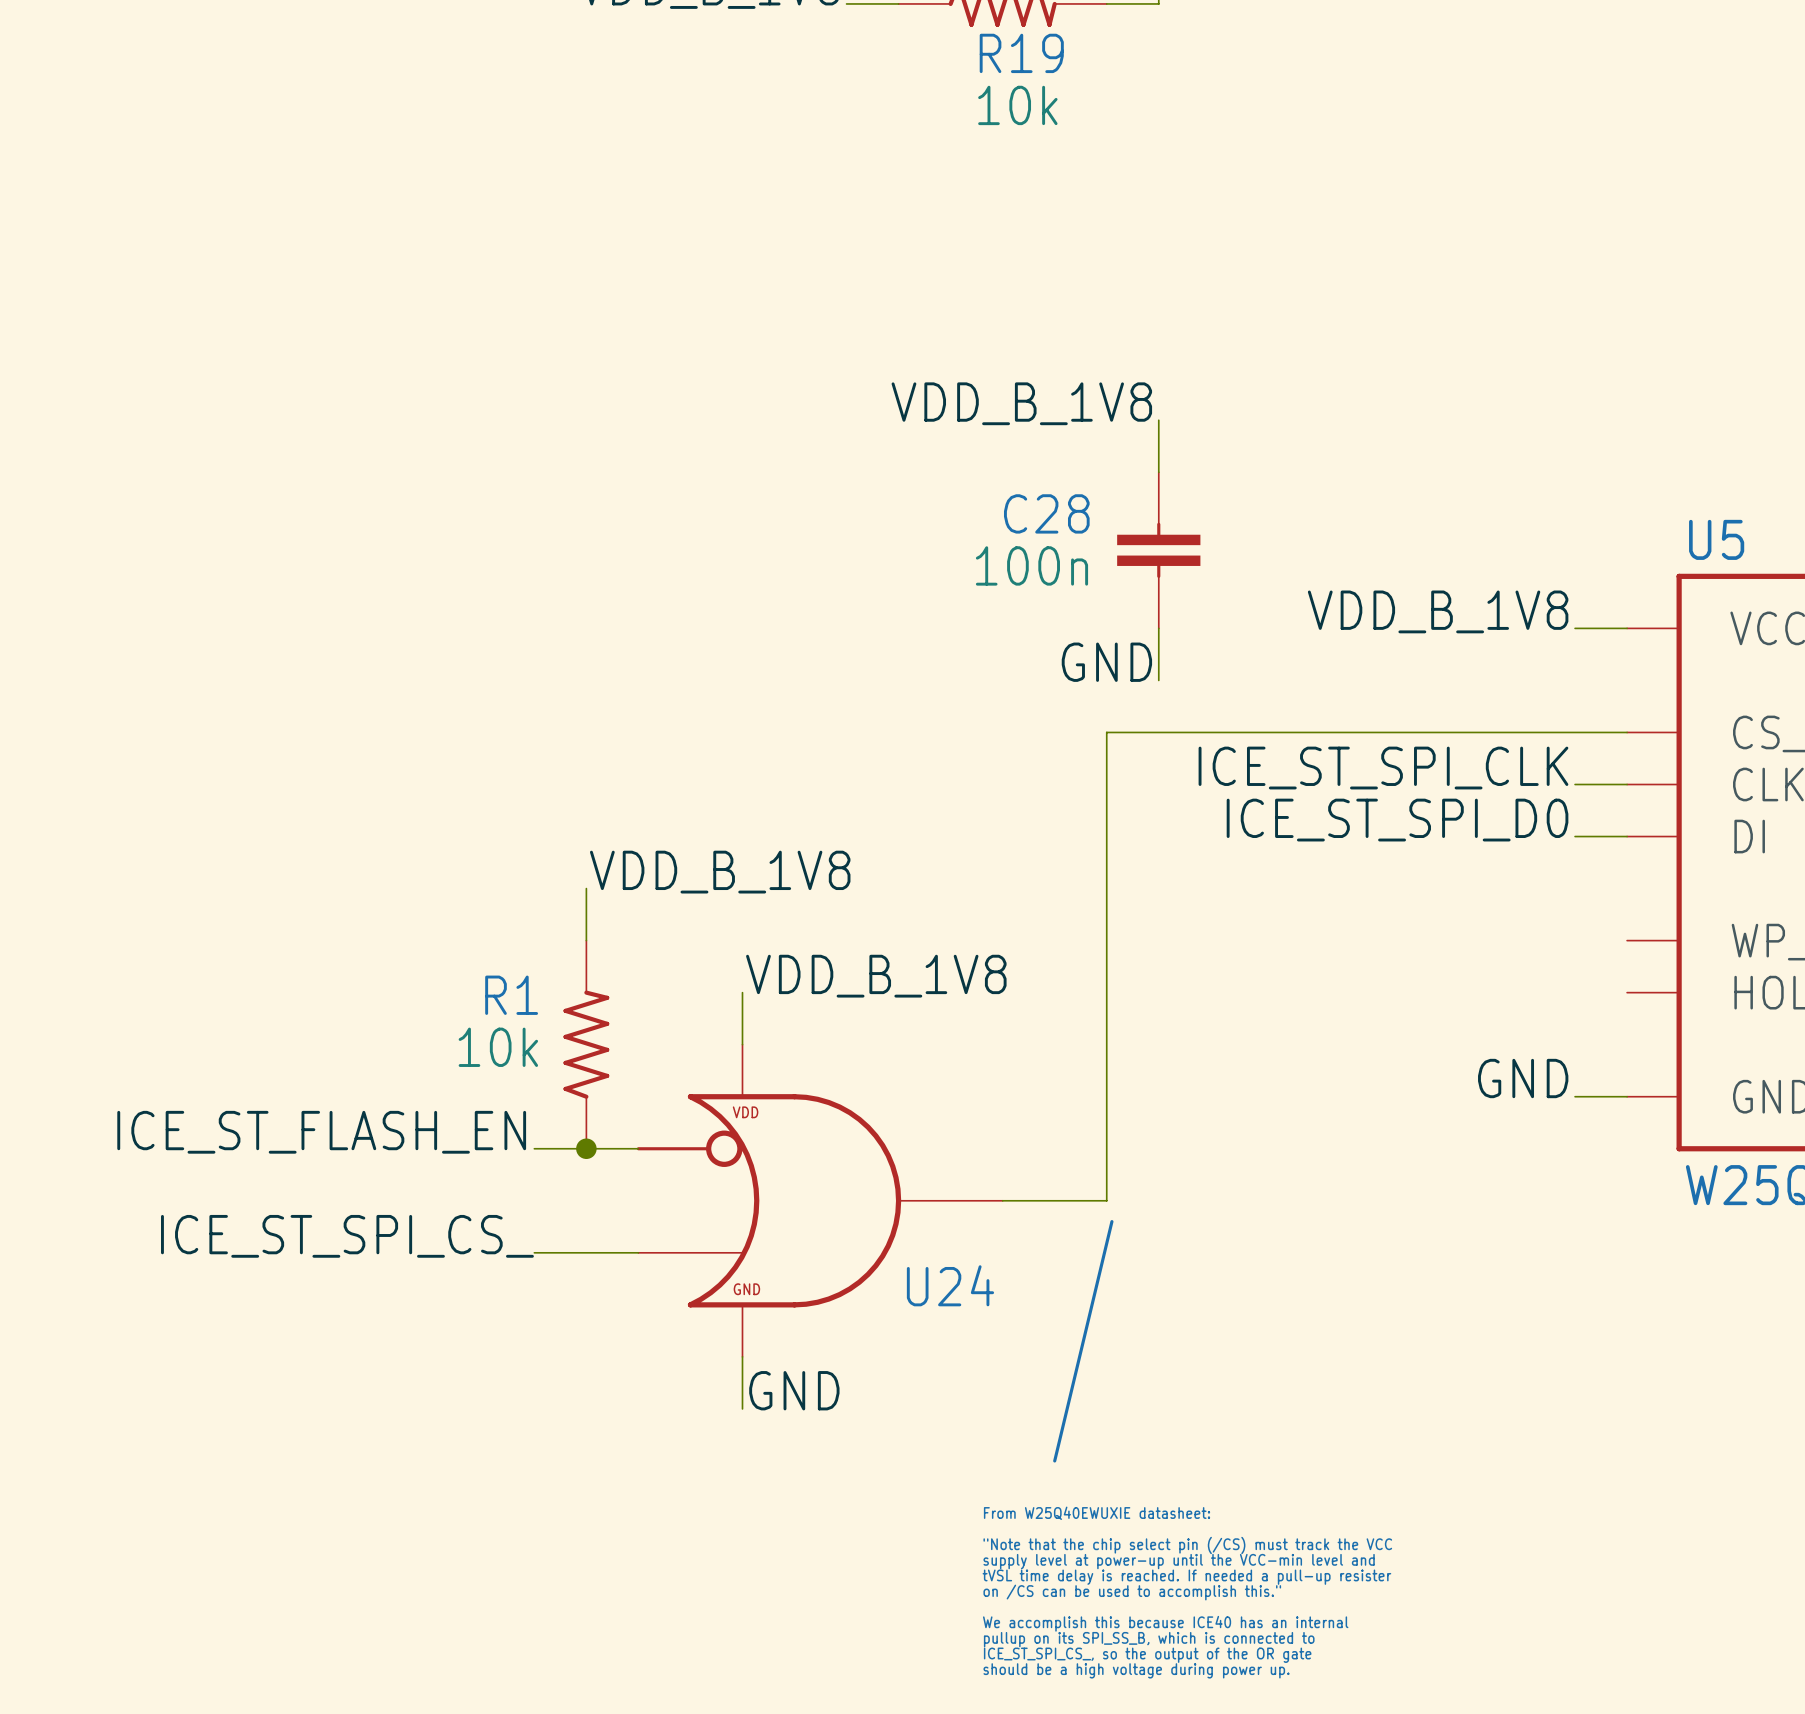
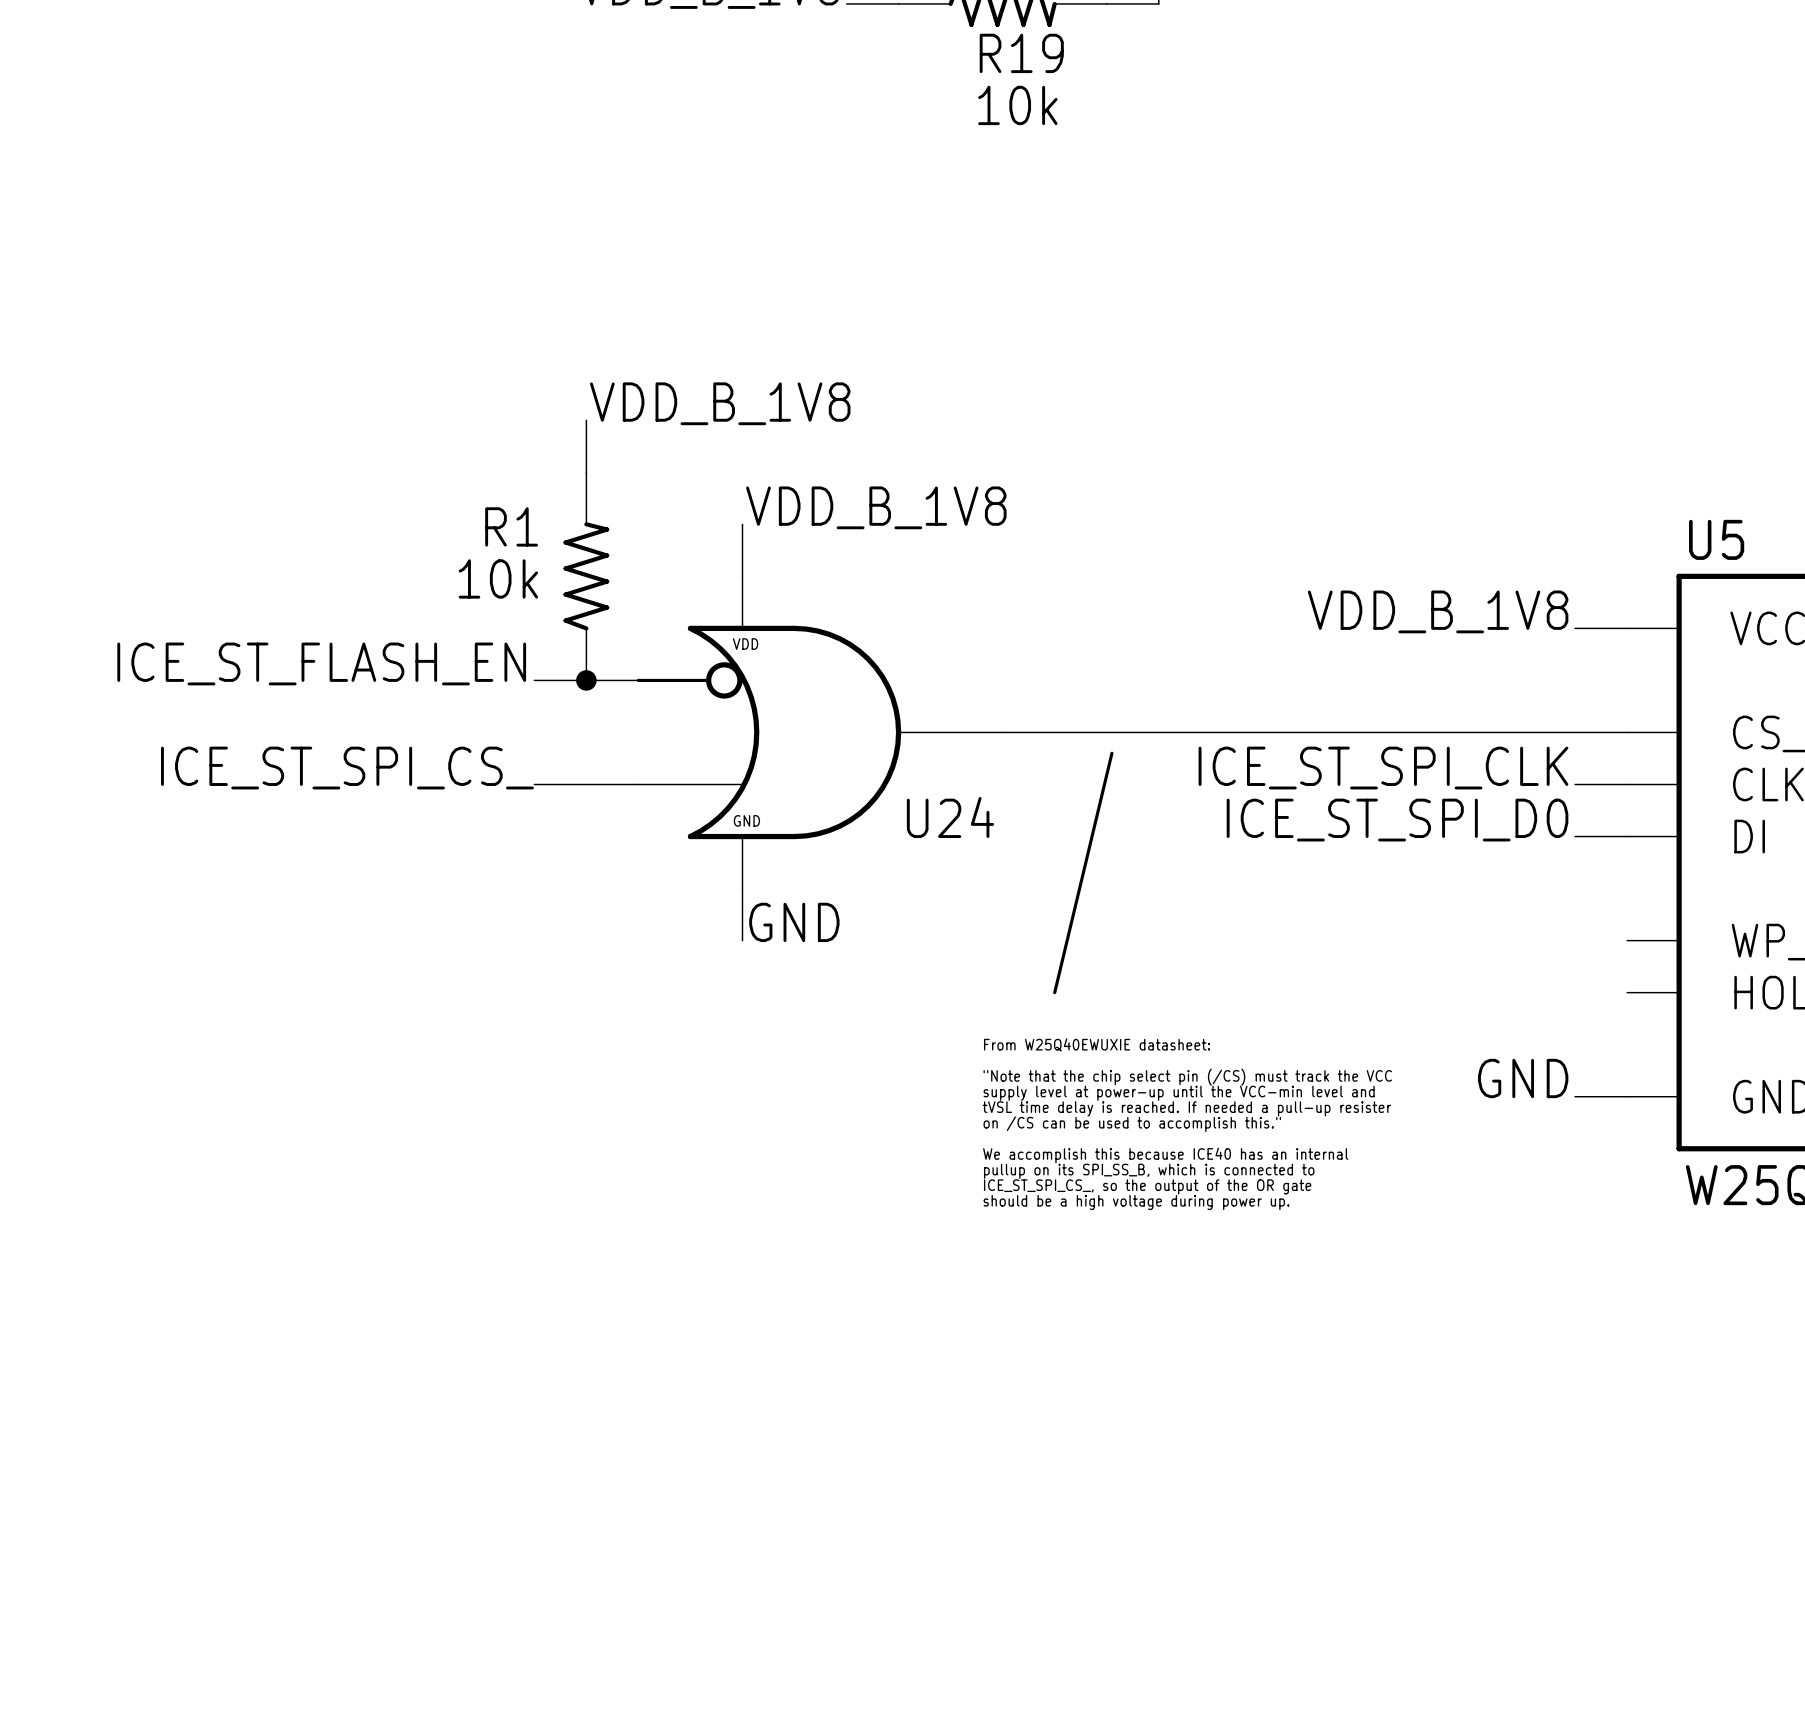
label: none -> VDD_B_1V8 (720, 403)
label: VDD_B_1V8 (1021, 403) -> none
wire: (1158, 420) (1158, 472) -> none
label: none -> VDD_B_1V8 (876, 507)
C28: 100n (1158, 550) -> none
wire: (1158, 628) (1158, 680) -> none
label: GND (1106, 662) -> none
junction: none -> (586, 680)
wire: (1106, 732) (1106, 1200) (1002, 1200) -> (1106, 732) (1002, 732)
label: VDD_B_1V8 (720, 872) -> none
wire: (586, 888) (586, 940) -> (586, 420) (586, 472)
label: none -> GND (794, 922)
label: VDD_B_1V8 (876, 976) -> none
wire: (742, 992) (742, 1044) -> (742, 524) (742, 576)
R1 position: (586, 1044) -> (586, 576)
label position: ICE_ST_FLASH_EN (321, 1132) -> ICE_ST_FLASH_EN (321, 663)
wire: (534, 1148) (638, 1148) -> (534, 680) (638, 680)
junction: (586, 1148) -> none
U24 position: (819, 1200) -> (819, 732)
line: (1111, 1221) (1054, 1460) -> (1111, 753) (1054, 992)
label position: ICE_ST_SPI_CS_ (347, 1236) -> ICE_ST_SPI_CS_ (347, 768)
wire: (534, 1252) (638, 1252) -> (534, 784) (638, 784)
wire: (742, 1356) (742, 1408) -> (742, 888) (742, 940)
label: GND (794, 1390) -> none
text position: From W25Q40EWUXIE datasheet: (1097, 1513) -> From W25Q40EWUXIE datasheet: (1097, 1044)
text position: "Note that the chip select pin (/CS) must track the VCC (1187, 1545) -> "Note that the chip select pin (/CS) must track the VCC (1187, 1077)
text position: supply level at power-up until the VCC-min level and (1179, 1561) -> supply level at power-up until the VCC-min level and (1179, 1093)
text position: tVSL time delay is reached. If needed a pull-up resister (1186, 1577) -> tVSL time delay is reached. If needed a pull-up resister (1186, 1108)
text position: on /CS can be used to accomplish this." (1132, 1592) -> on /CS can be used to accomplish this." (1132, 1124)
text position: We accomplish this because ICE40 has an internal (1165, 1623) -> We accomplish this because ICE40 has an internal (1165, 1155)
text position: pullup on its SPI_SS_B, which is connected to (1149, 1639) -> pullup on its SPI_SS_B, which is connected to (1149, 1171)
text position: ICE_ST_SPI_CS_, so the output of the OR gate (1147, 1655) -> ICE_ST_SPI_CS_, so the output of the OR gate (1147, 1186)
text position: should be a high voltage during power up. (1136, 1670) -> should be a high voltage during power up. (1136, 1202)

